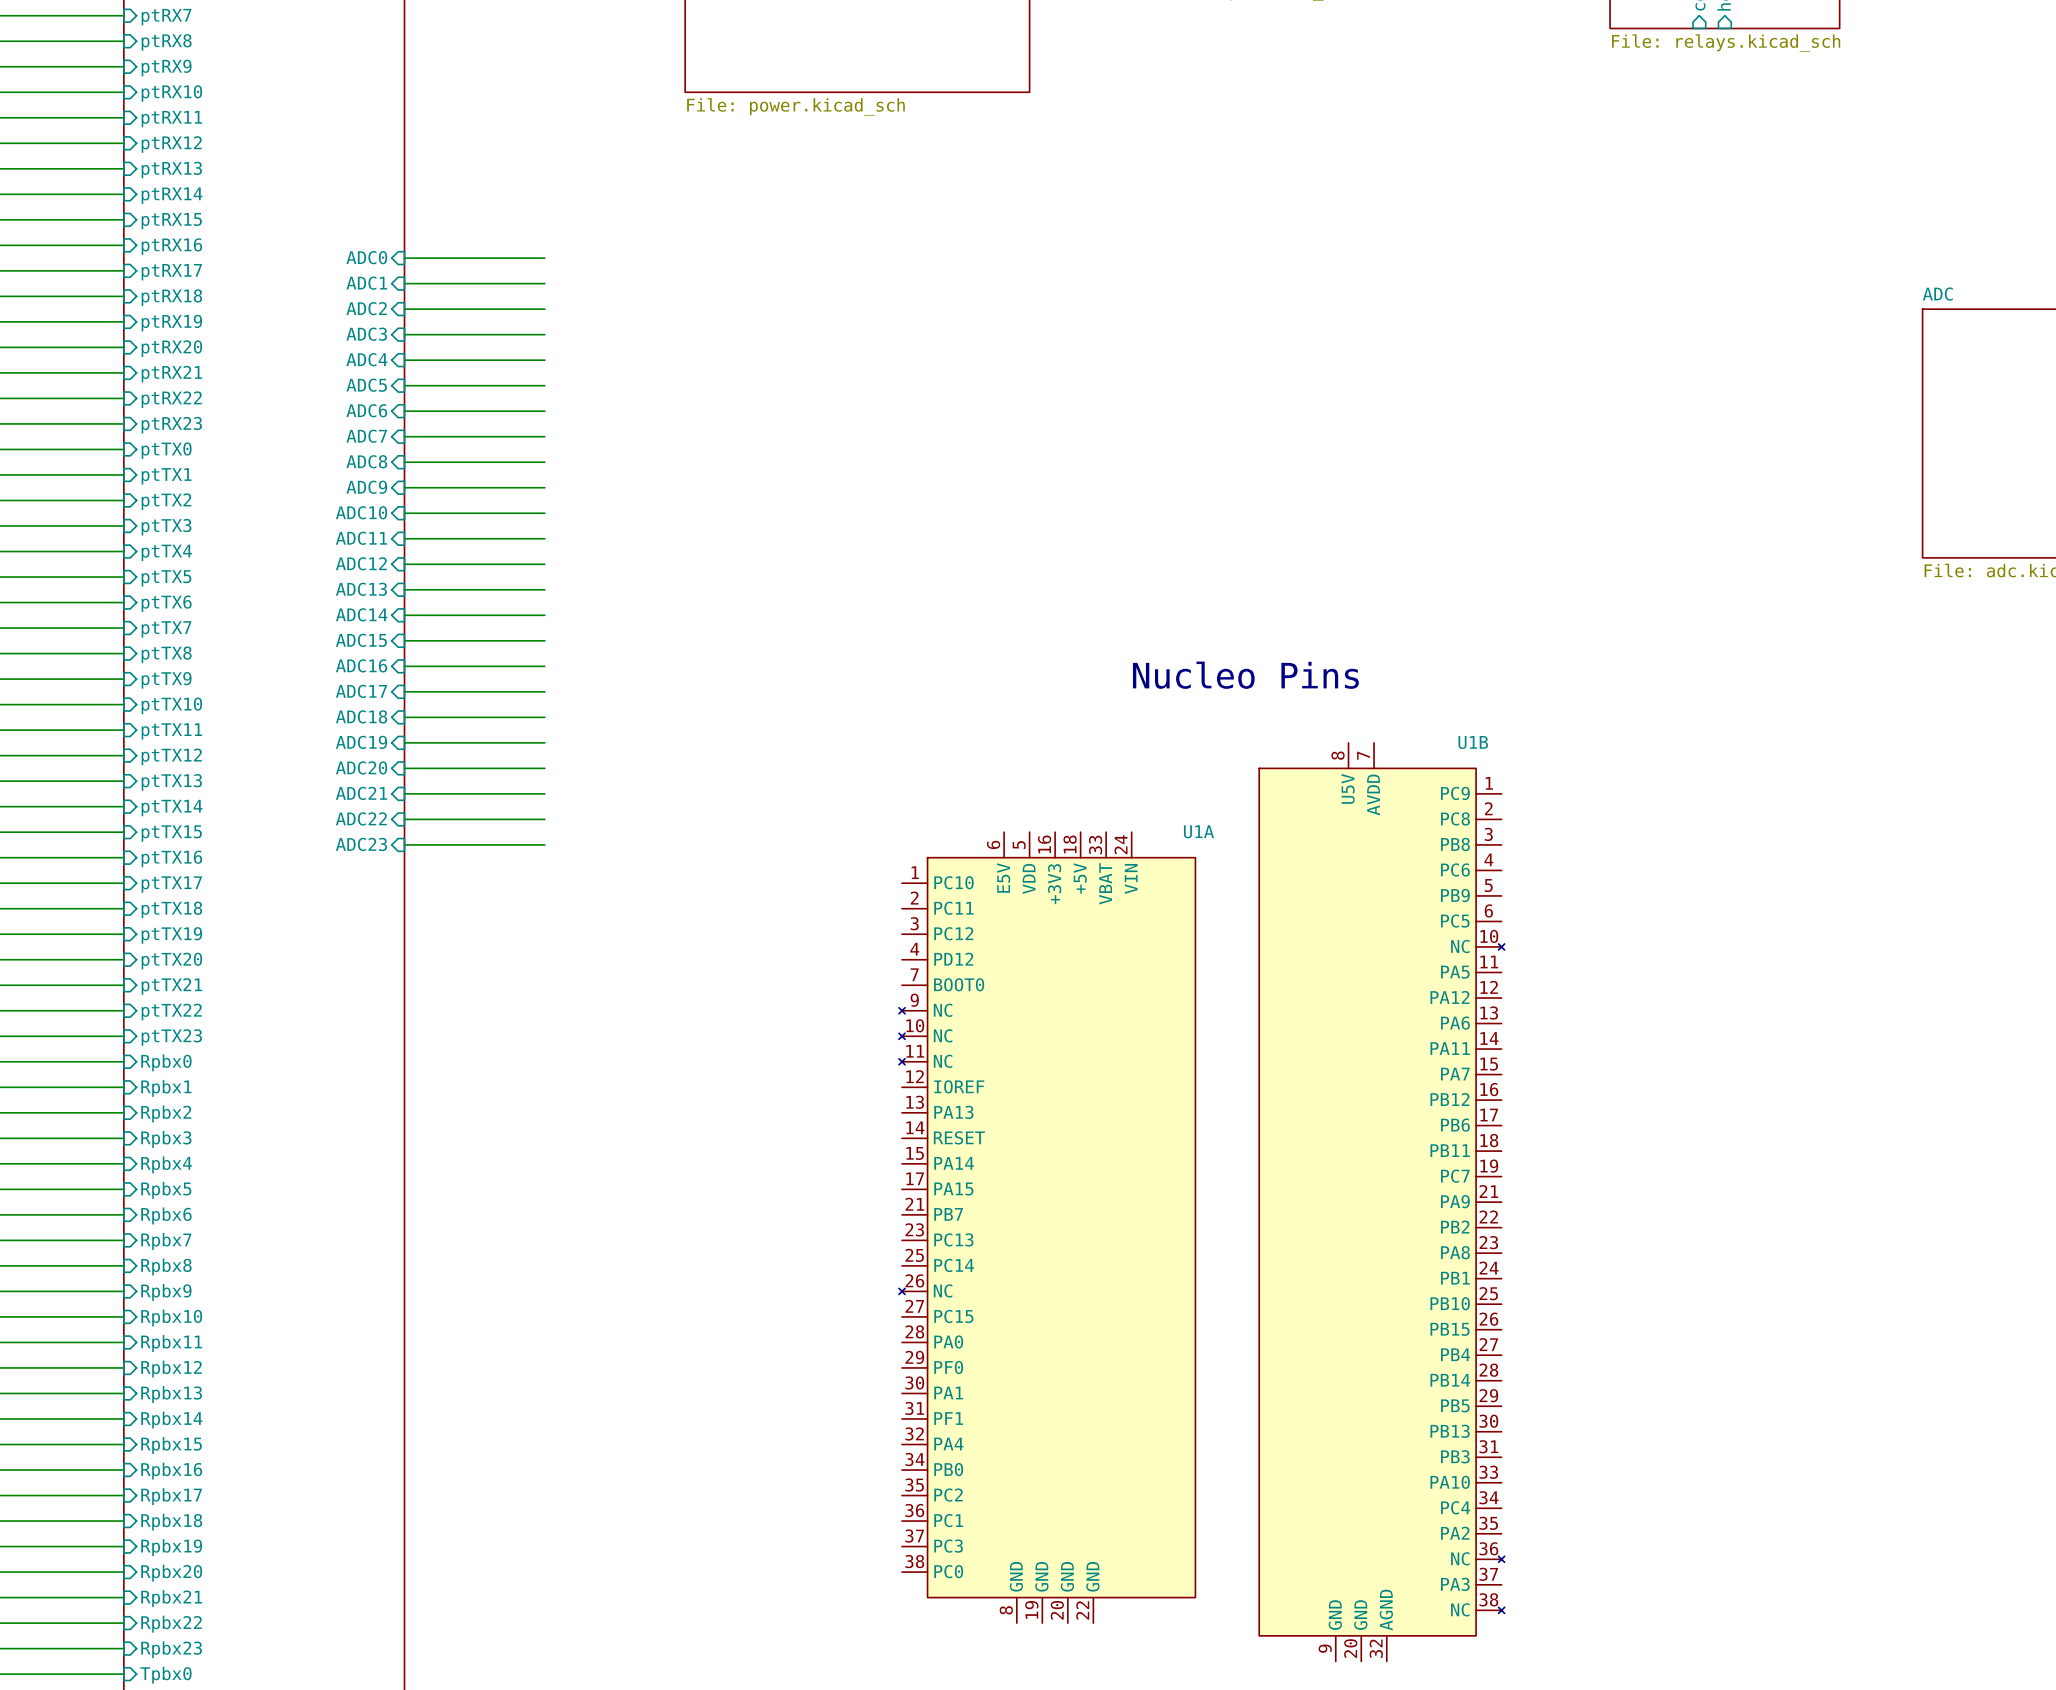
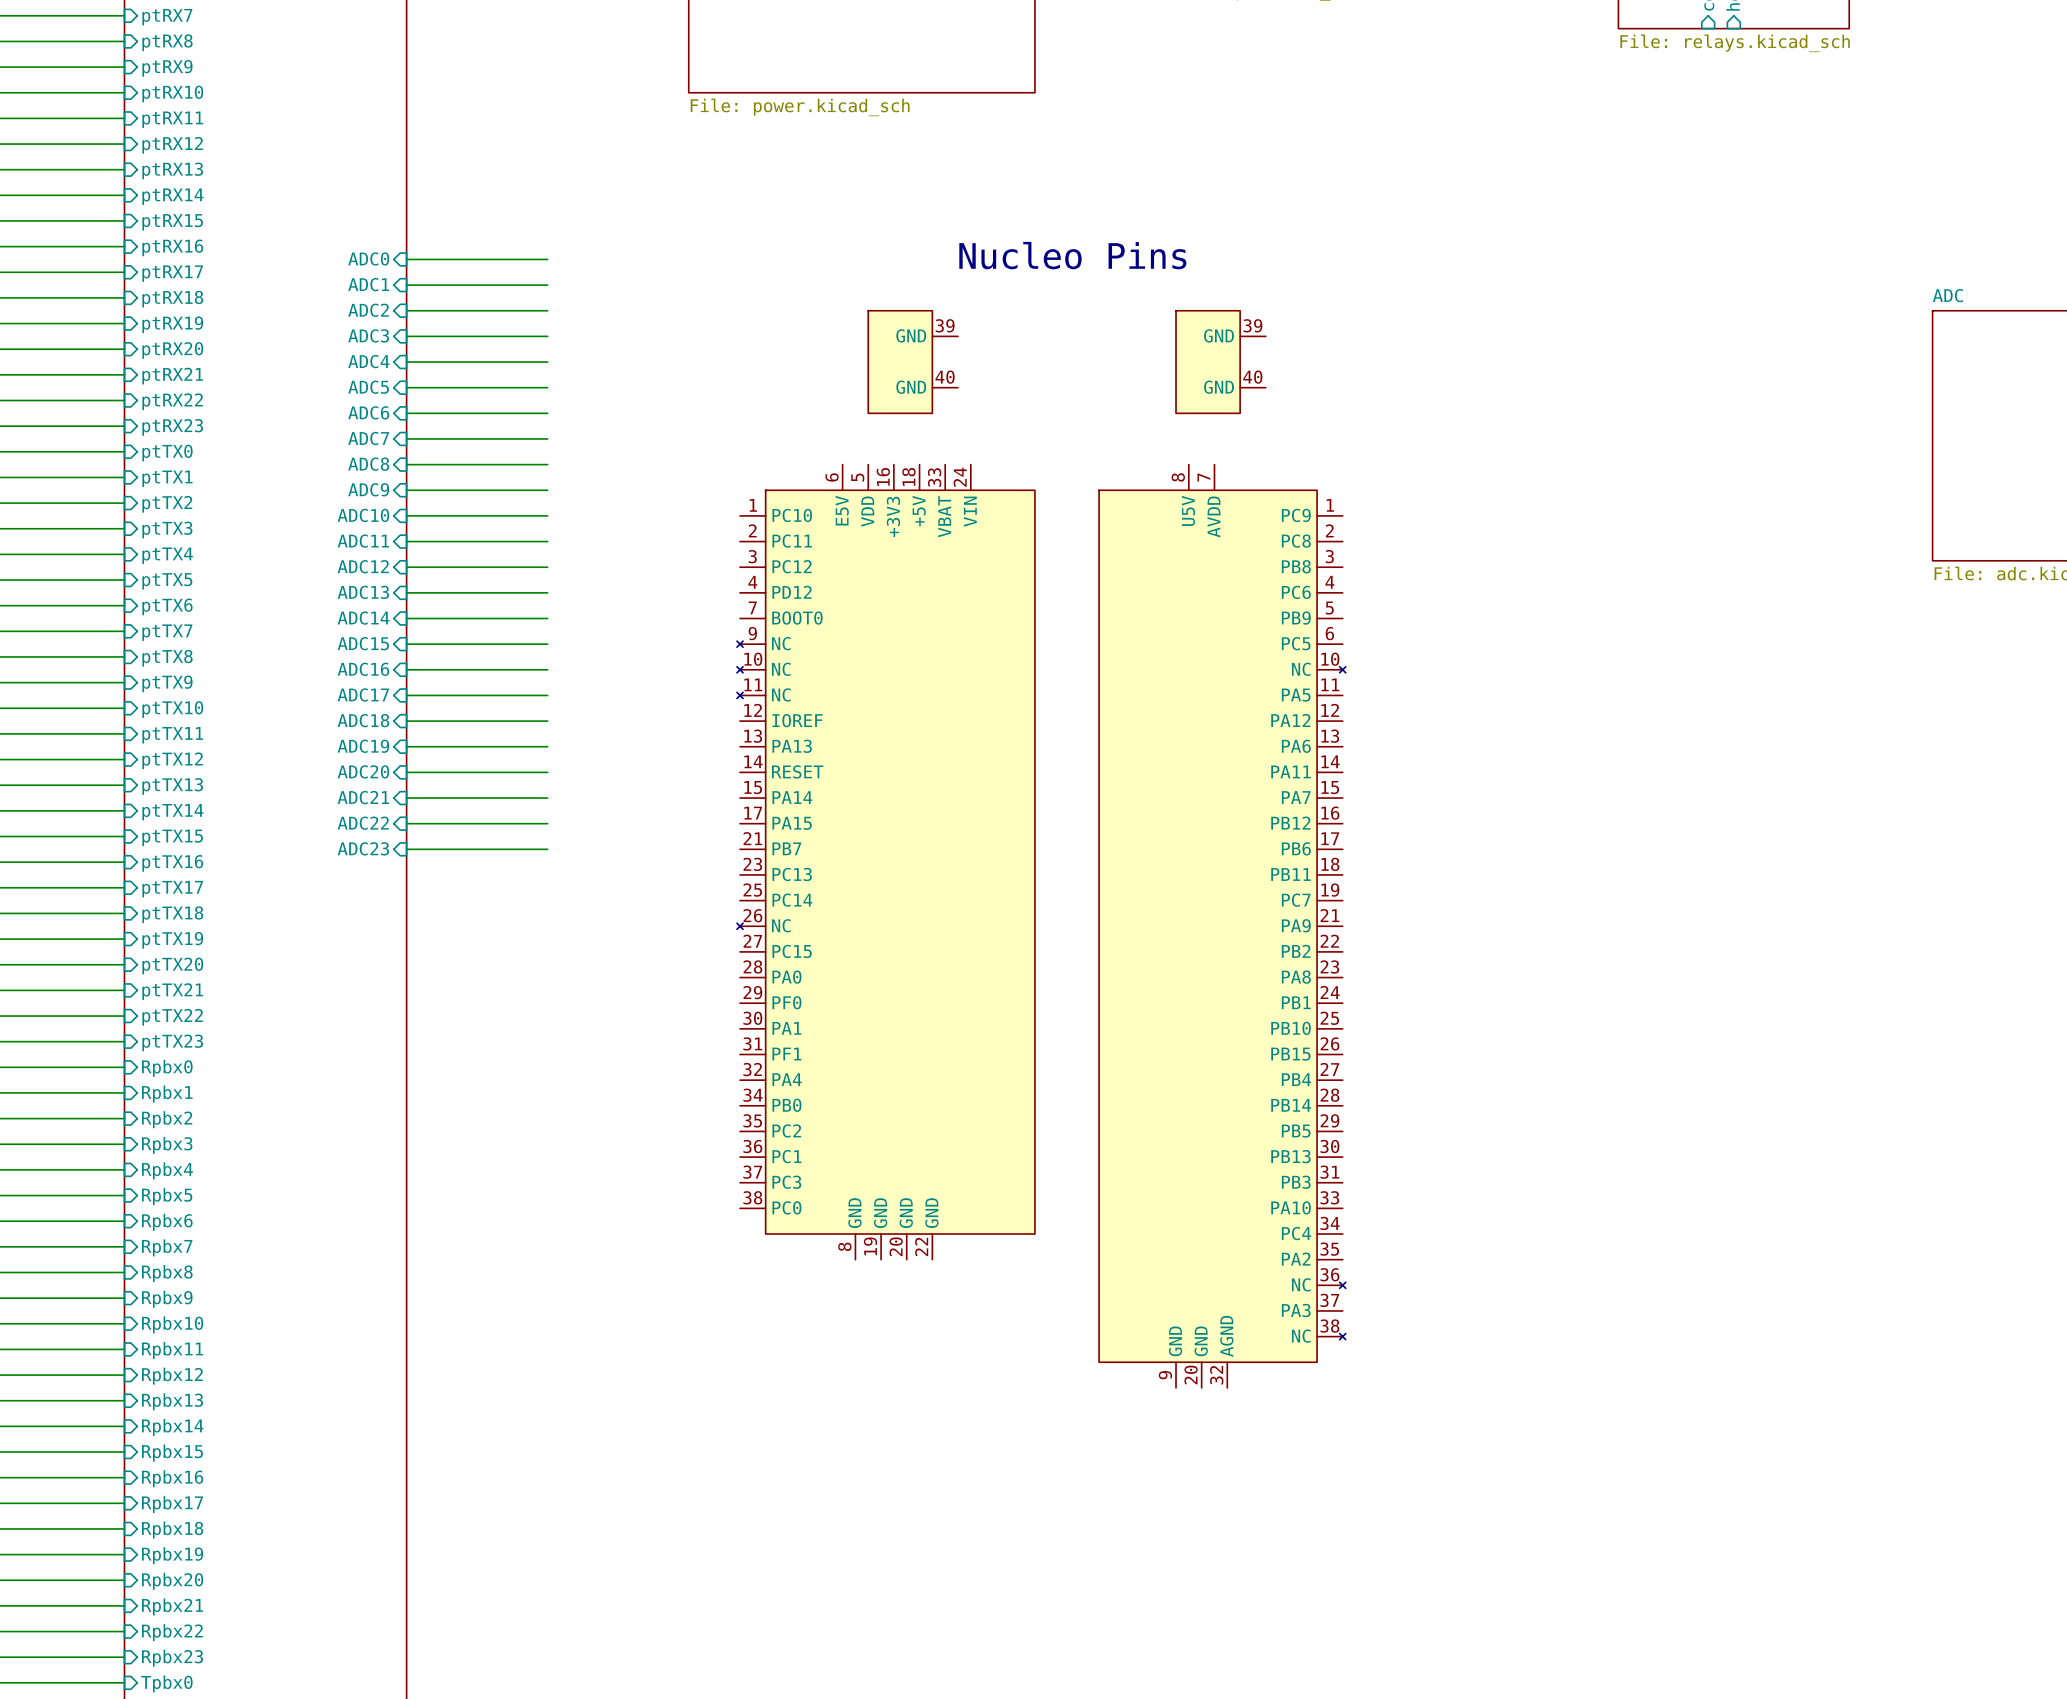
text: none -> Nucleo Pins (1072, 255)
part: none -> (913, 362)
part: none -> (1220, 362)
text: Nucleo Pins (1245, 675) -> none
part: none -> (885, 862)
part: none -> (1222, 926)
U1B: (1381, 1202) -> none
U1A: (1047, 1227) -> none

